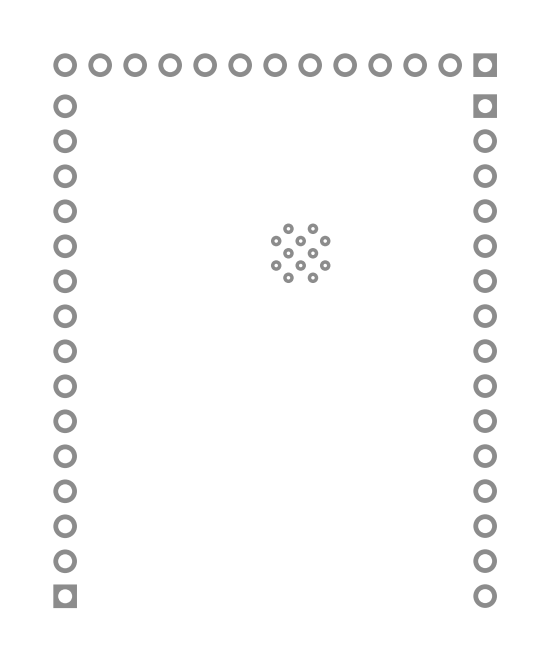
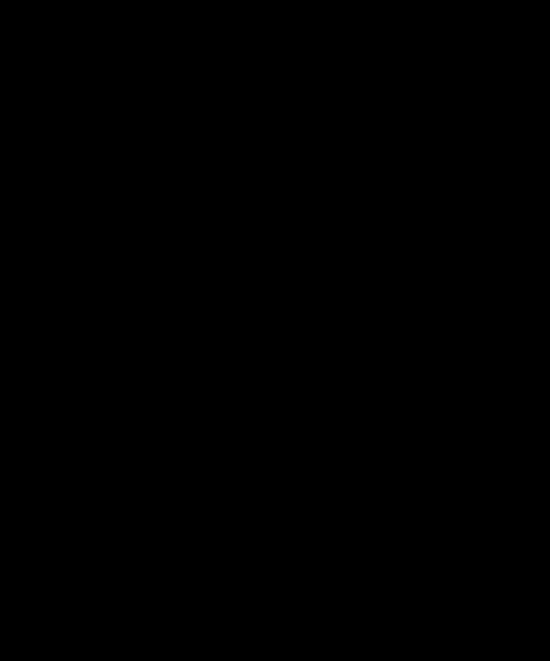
part: (275, 65) -> none
part: (300, 253) -> none
part: (65, 351) -> none
part: (485, 351) -> none

